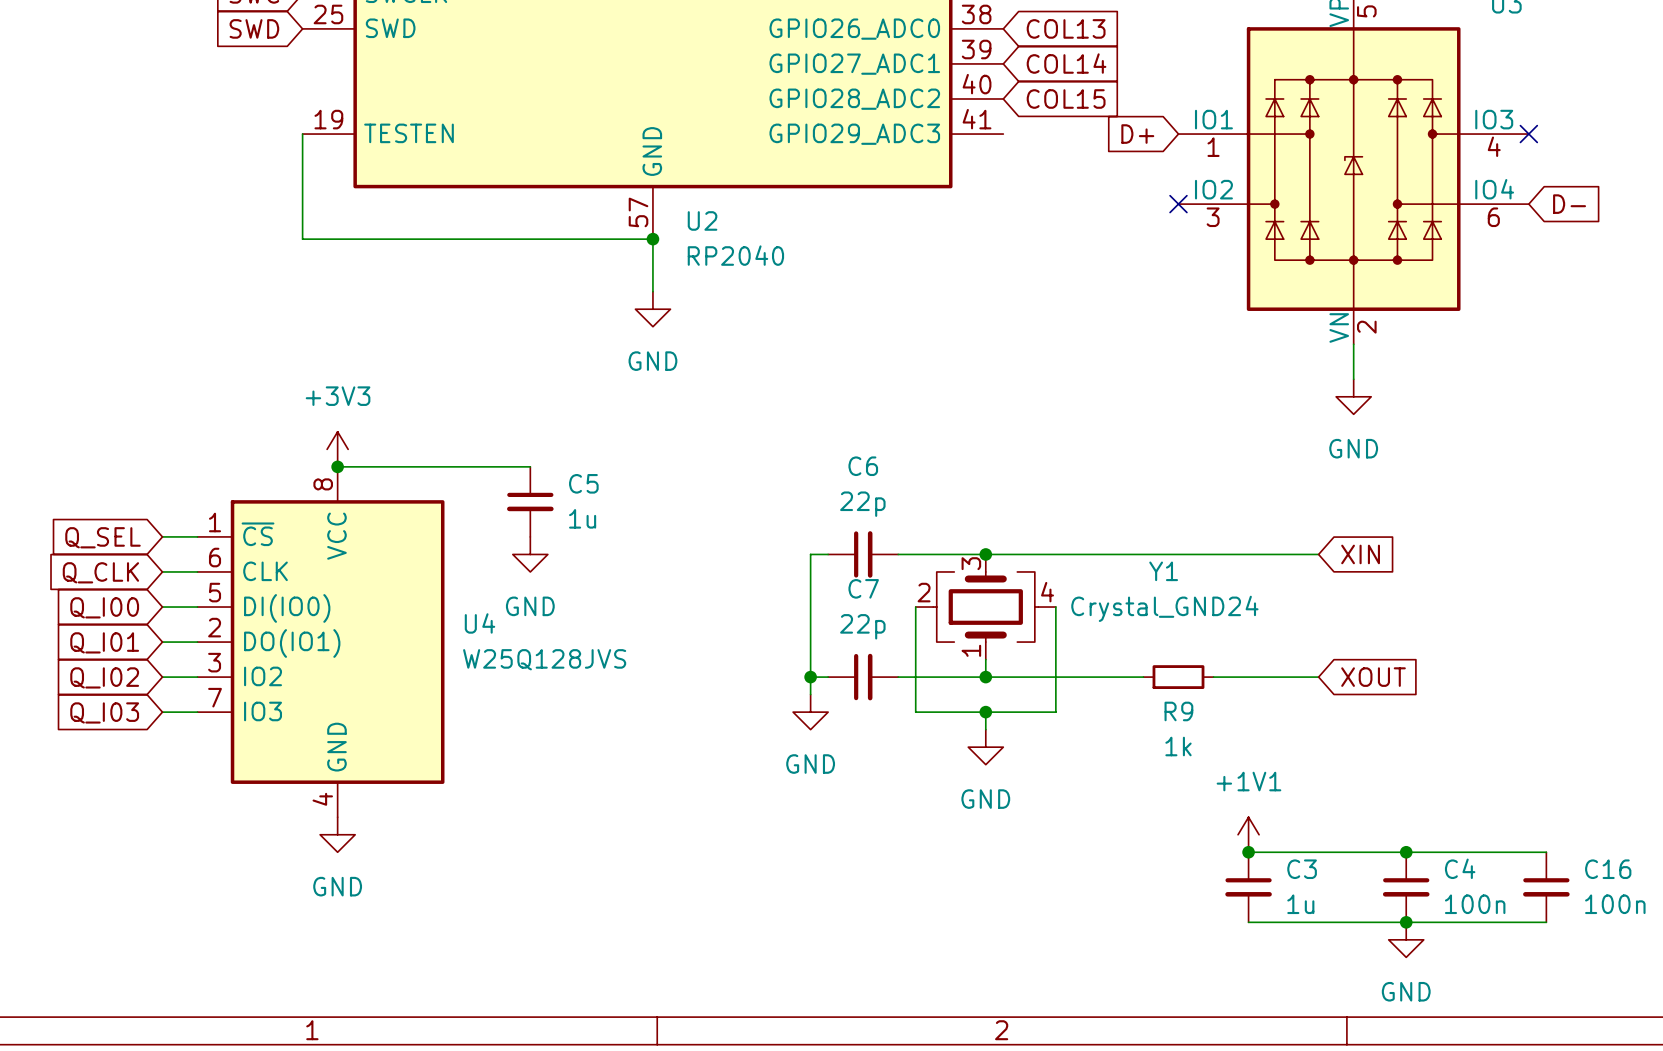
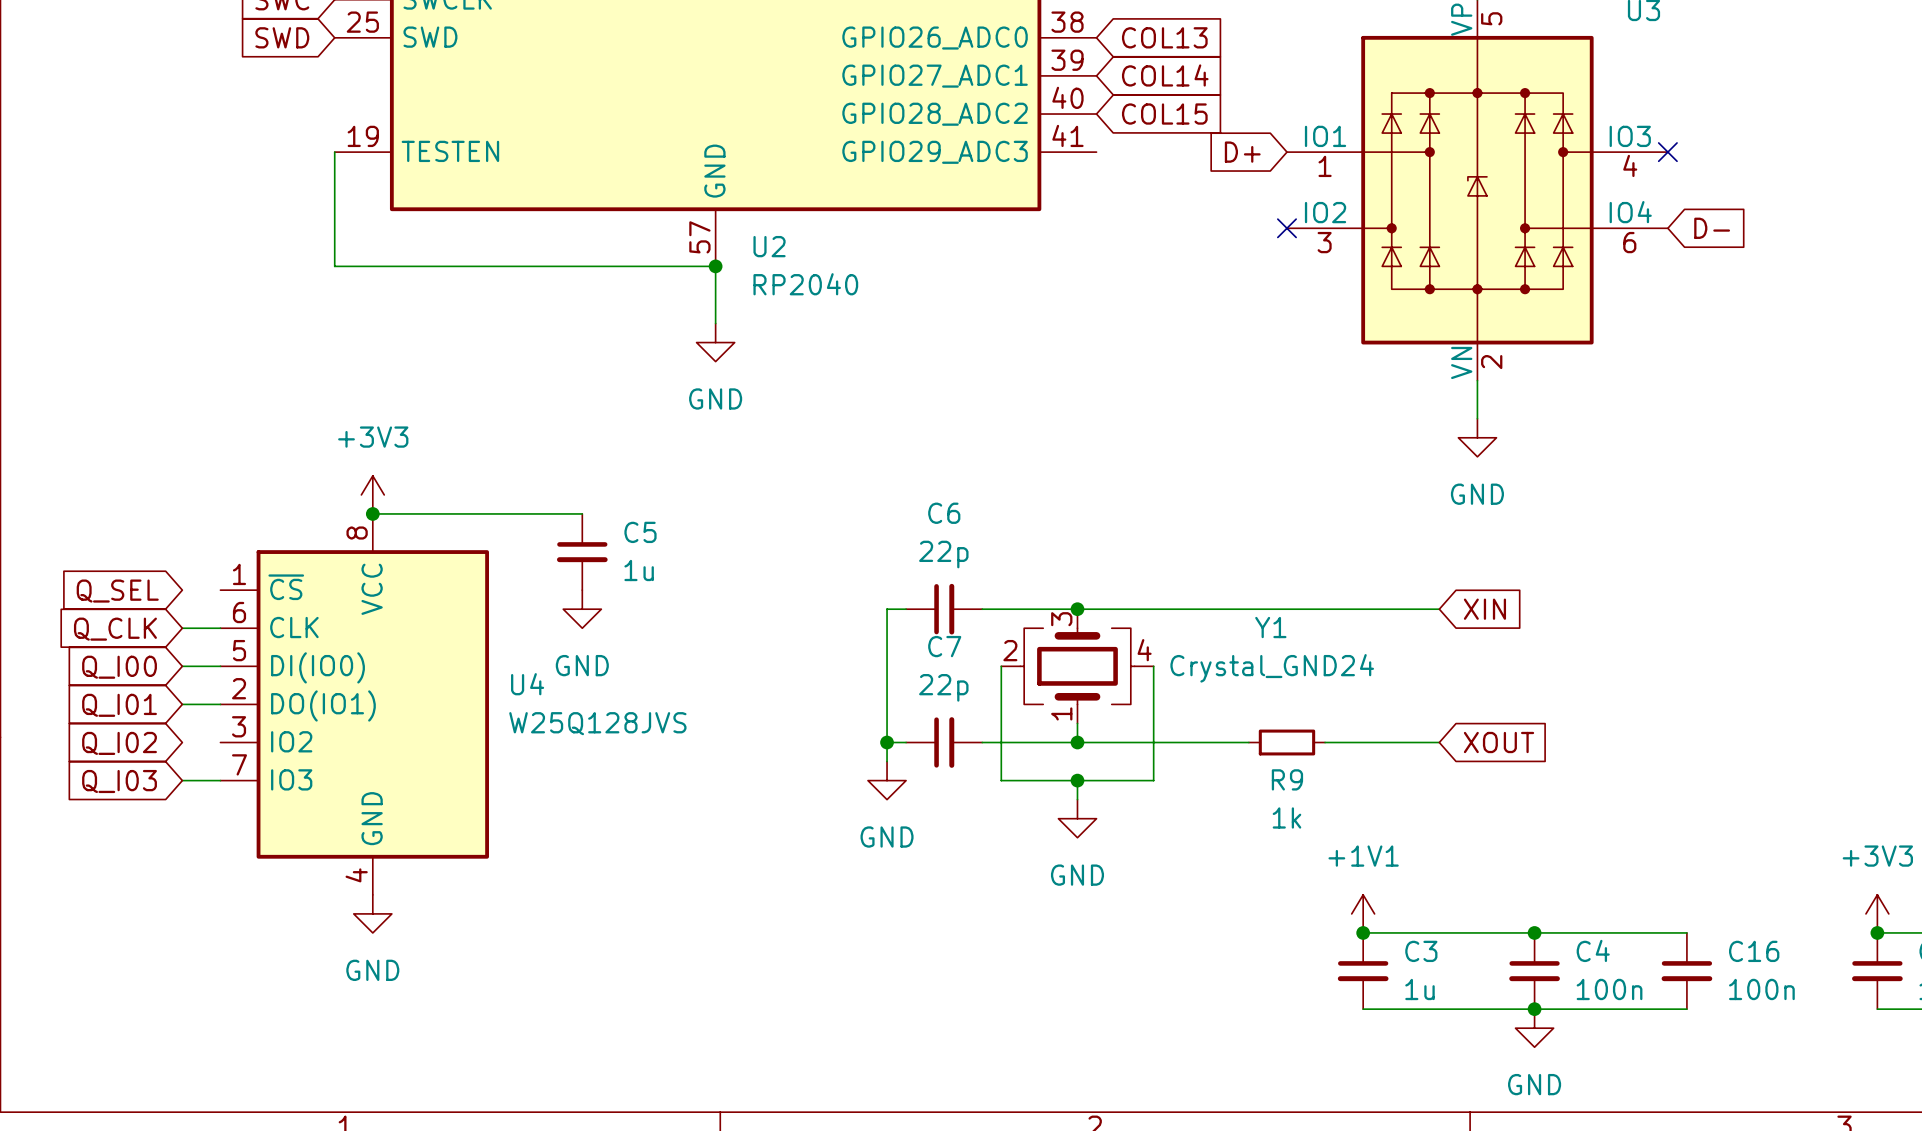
wire: (162, 536) (197, 536) -> none
wire: (162, 677) (197, 677) -> none

